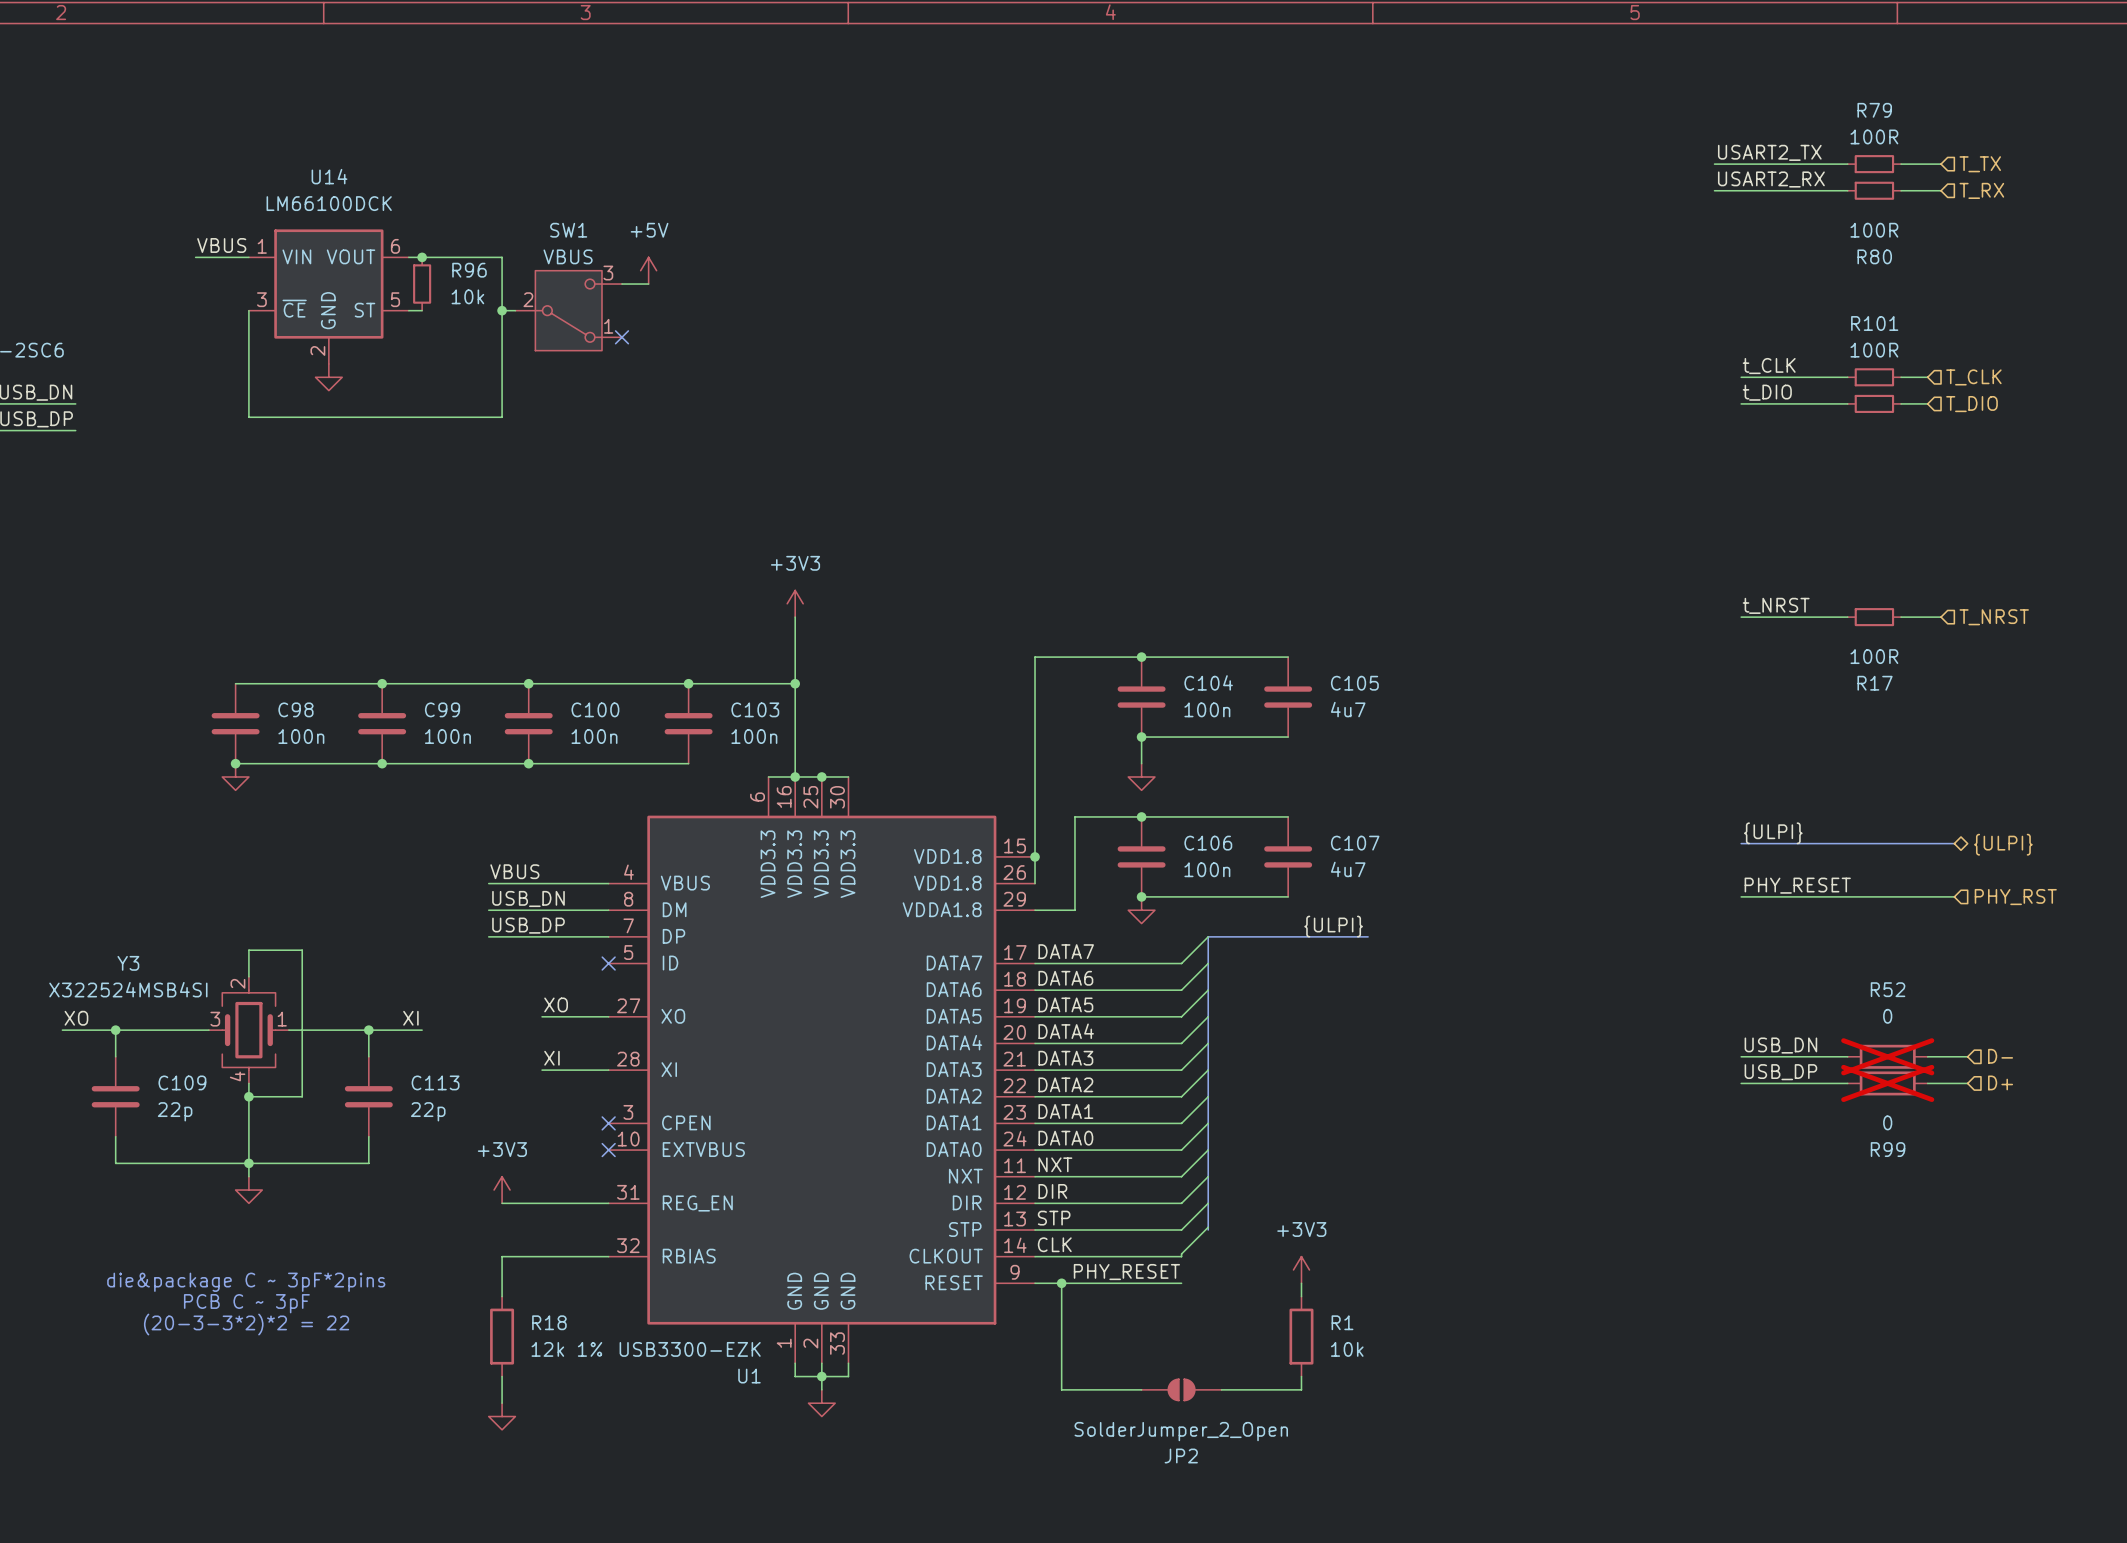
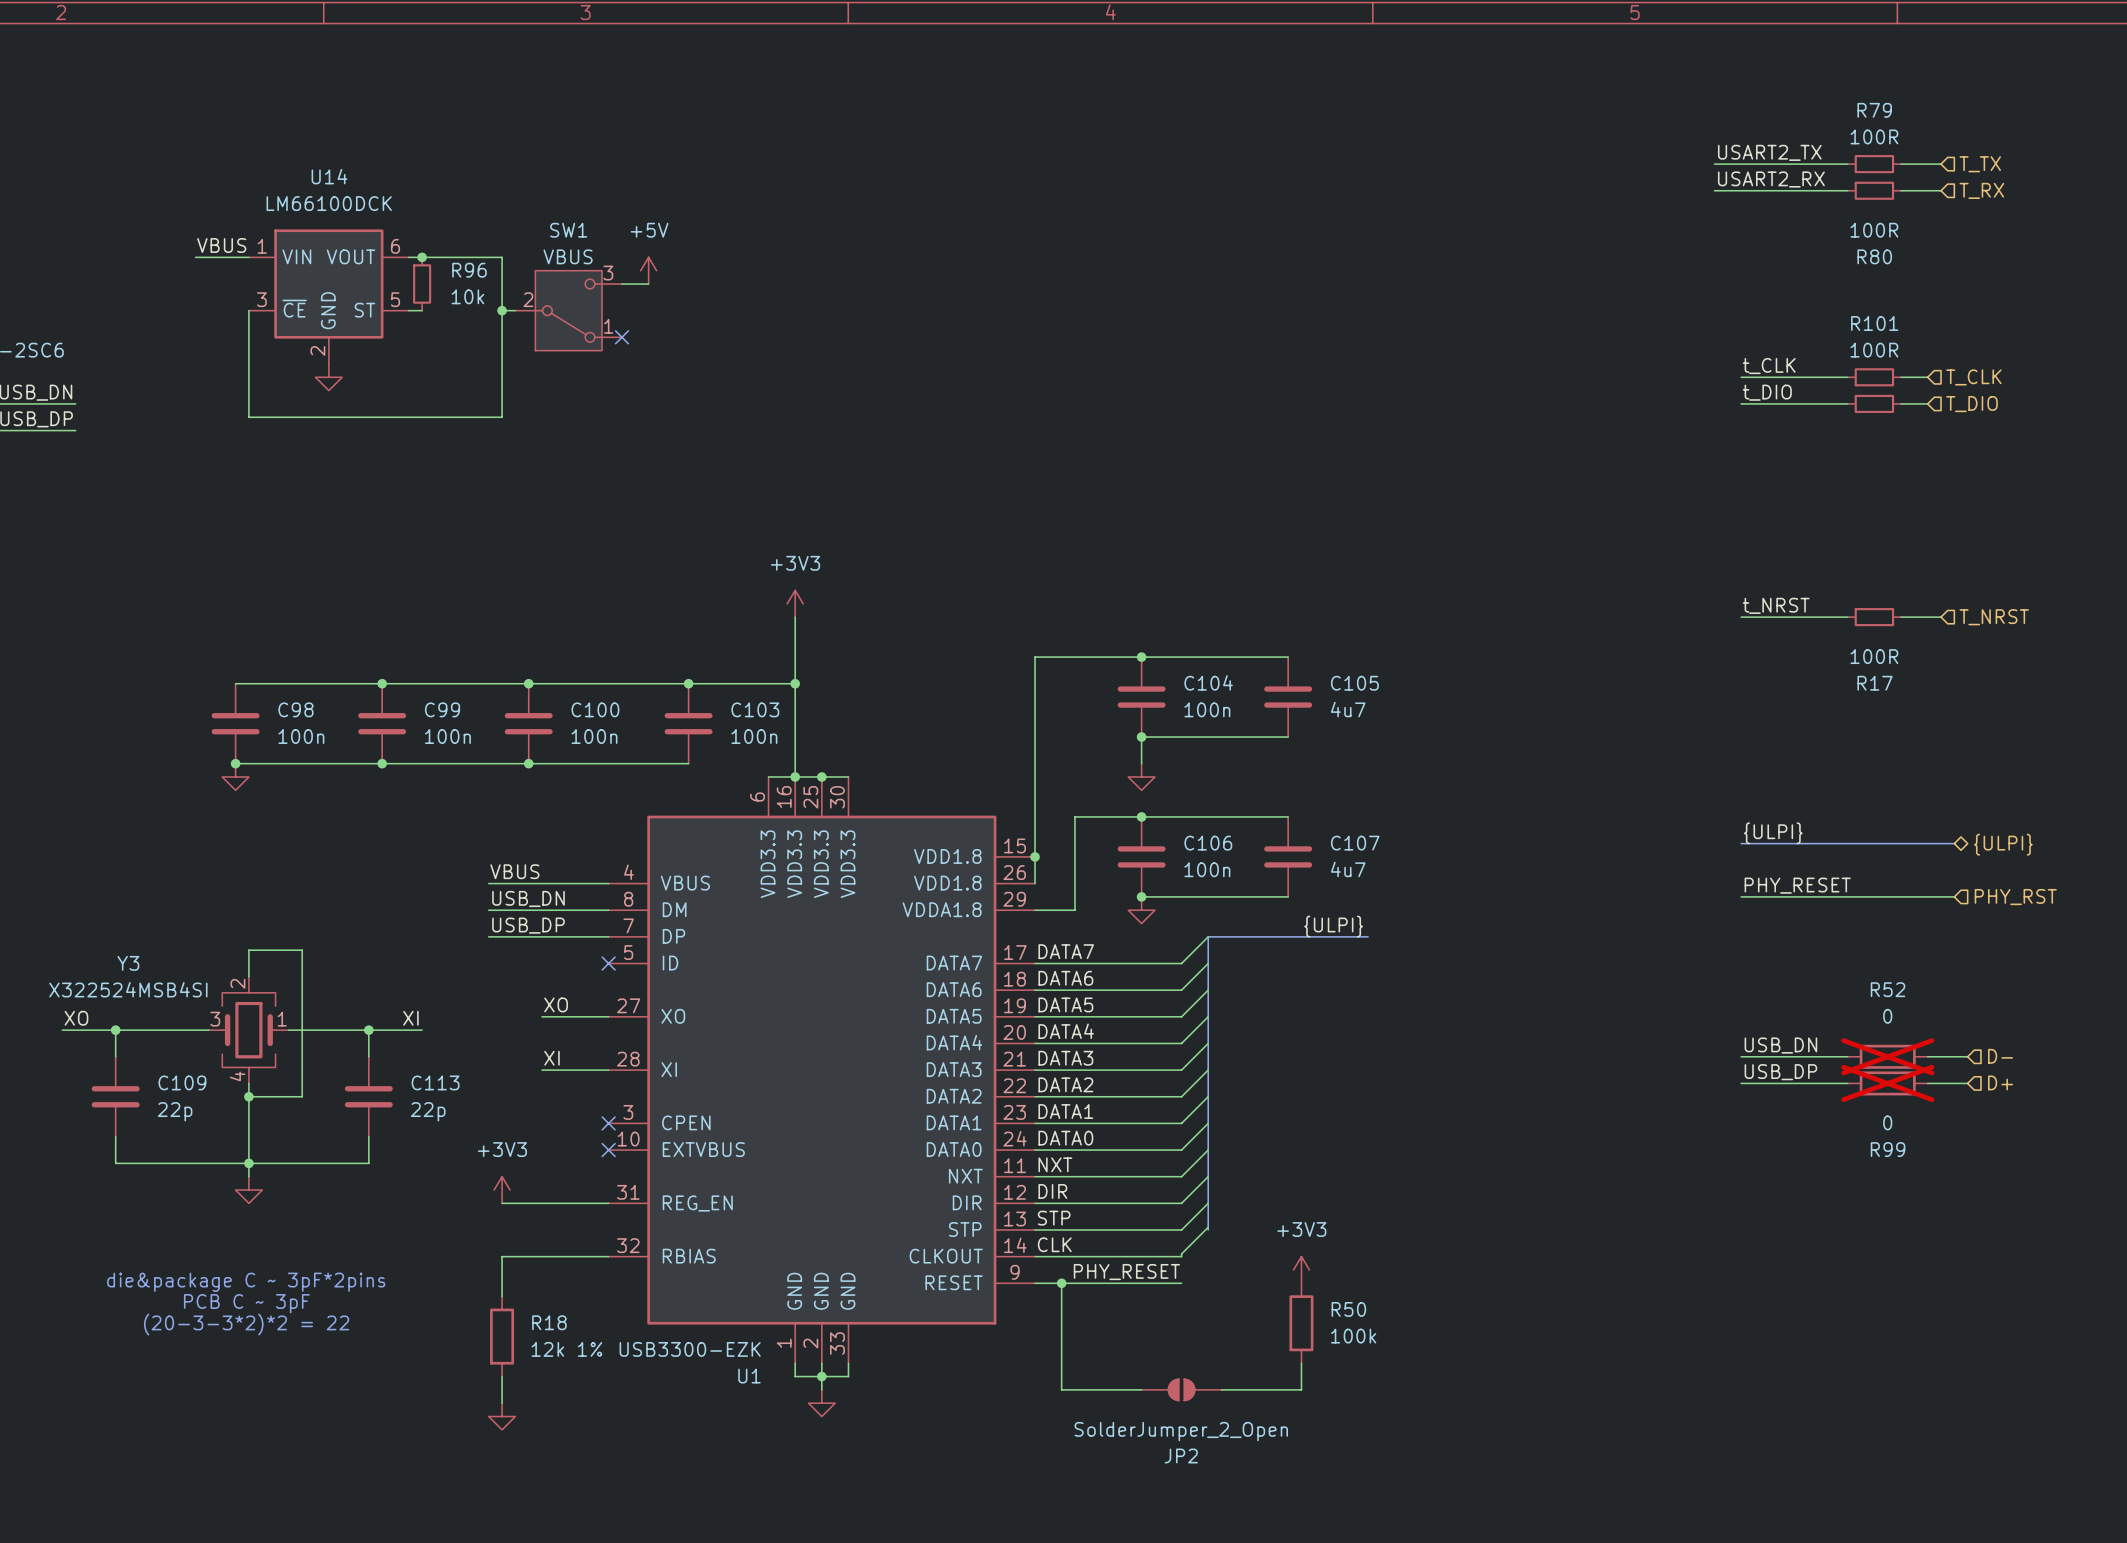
R50: none -> 100k (1301, 1323)
R1: 10k (1301, 1336) -> none

